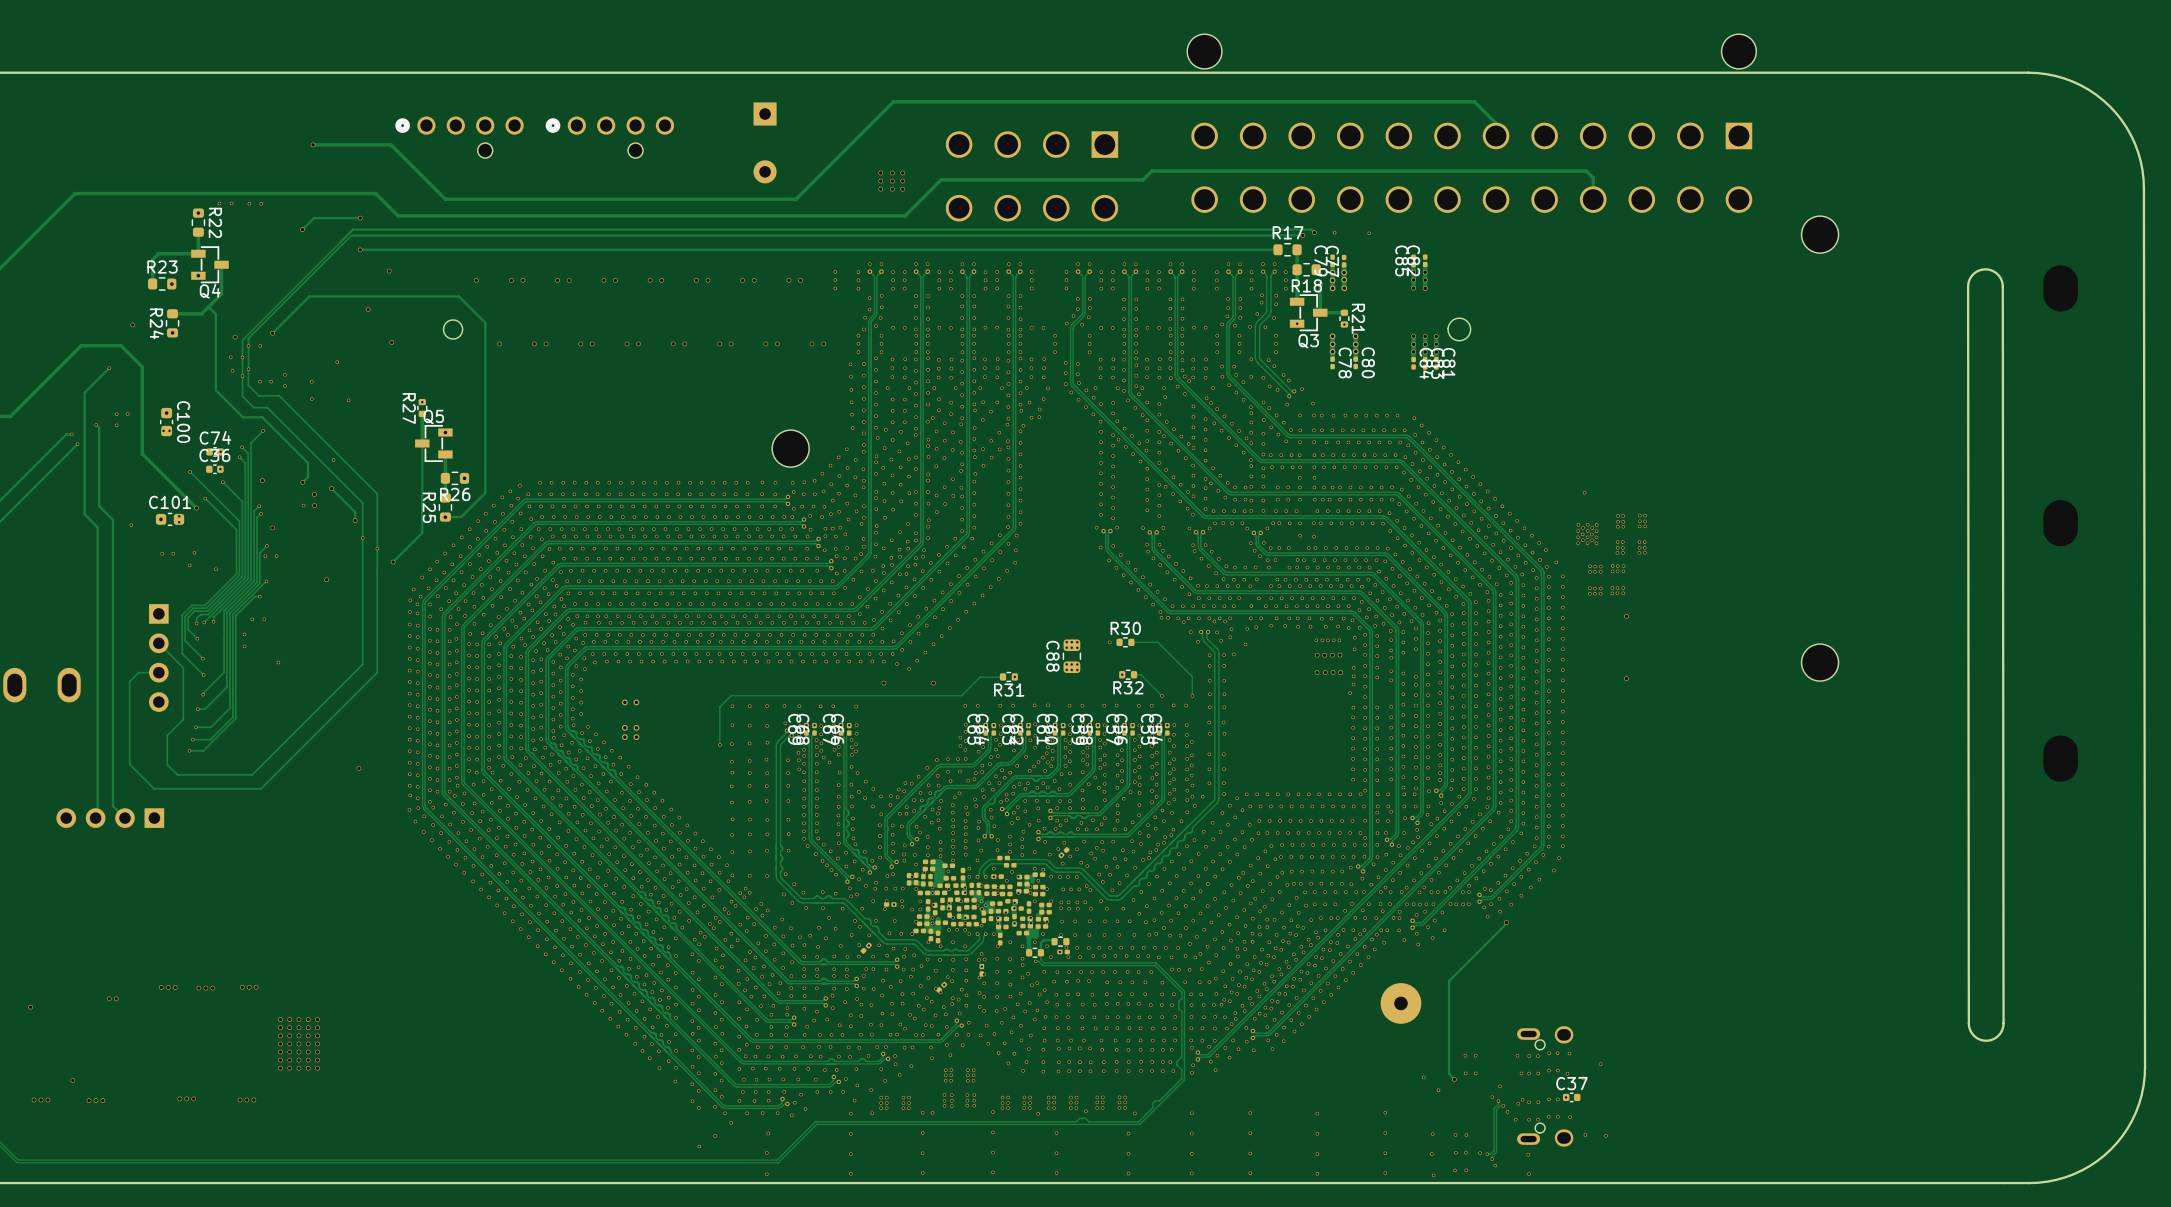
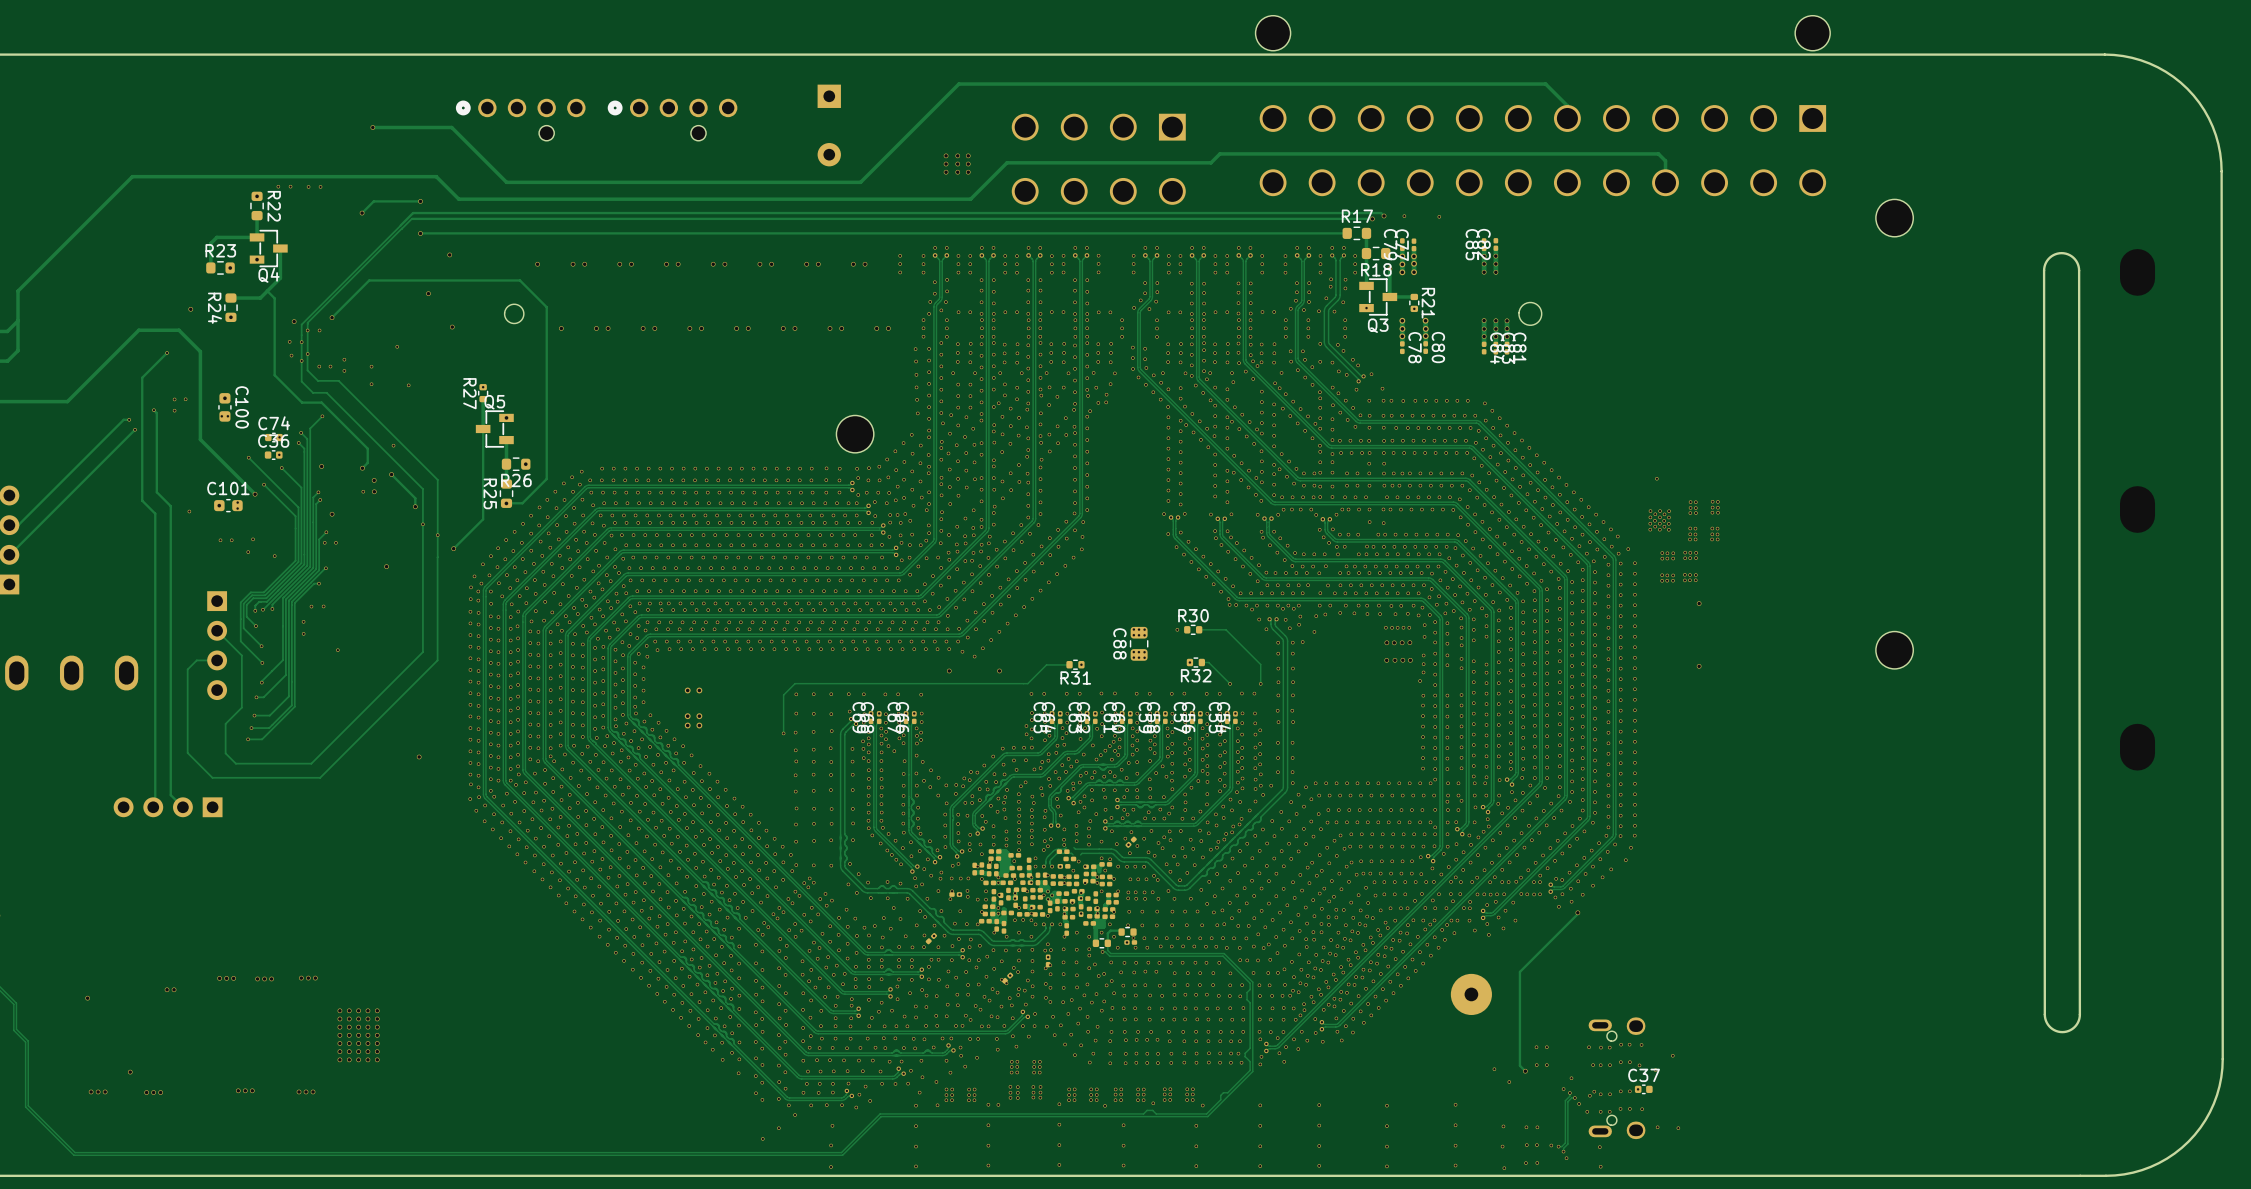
via: none -> (1050, 839)
via: (981, 850) -> none
via: none -> (1044, 841)
via: none -> (1064, 844)
via: none -> (1047, 846)
part: (1003, 858) -> none
part: none -> (1063, 851)
part: (1010, 865) -> none
via: (993, 868) -> none
part: none -> (1069, 858)

